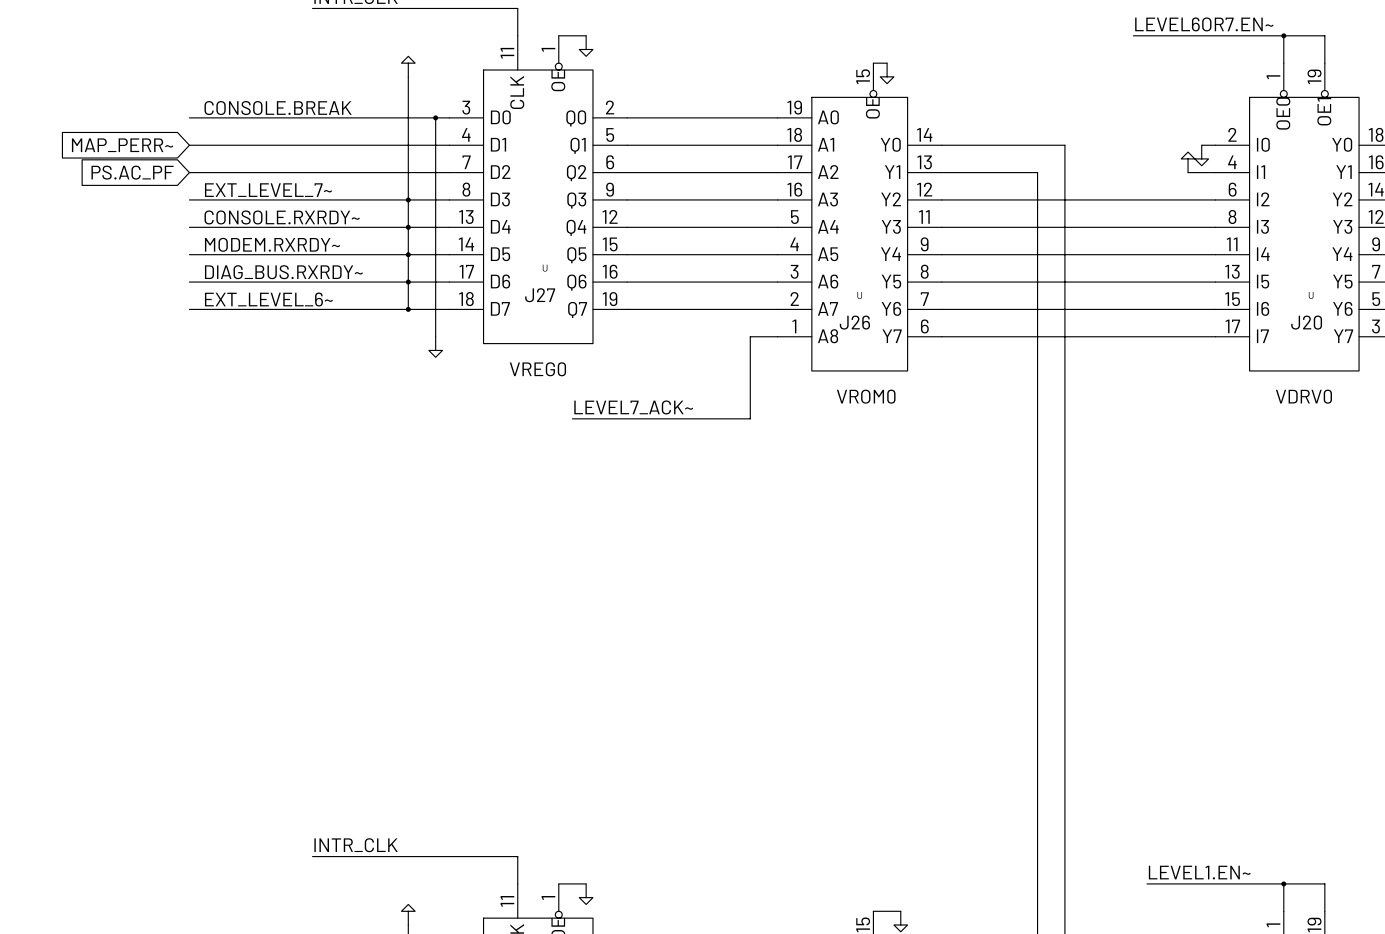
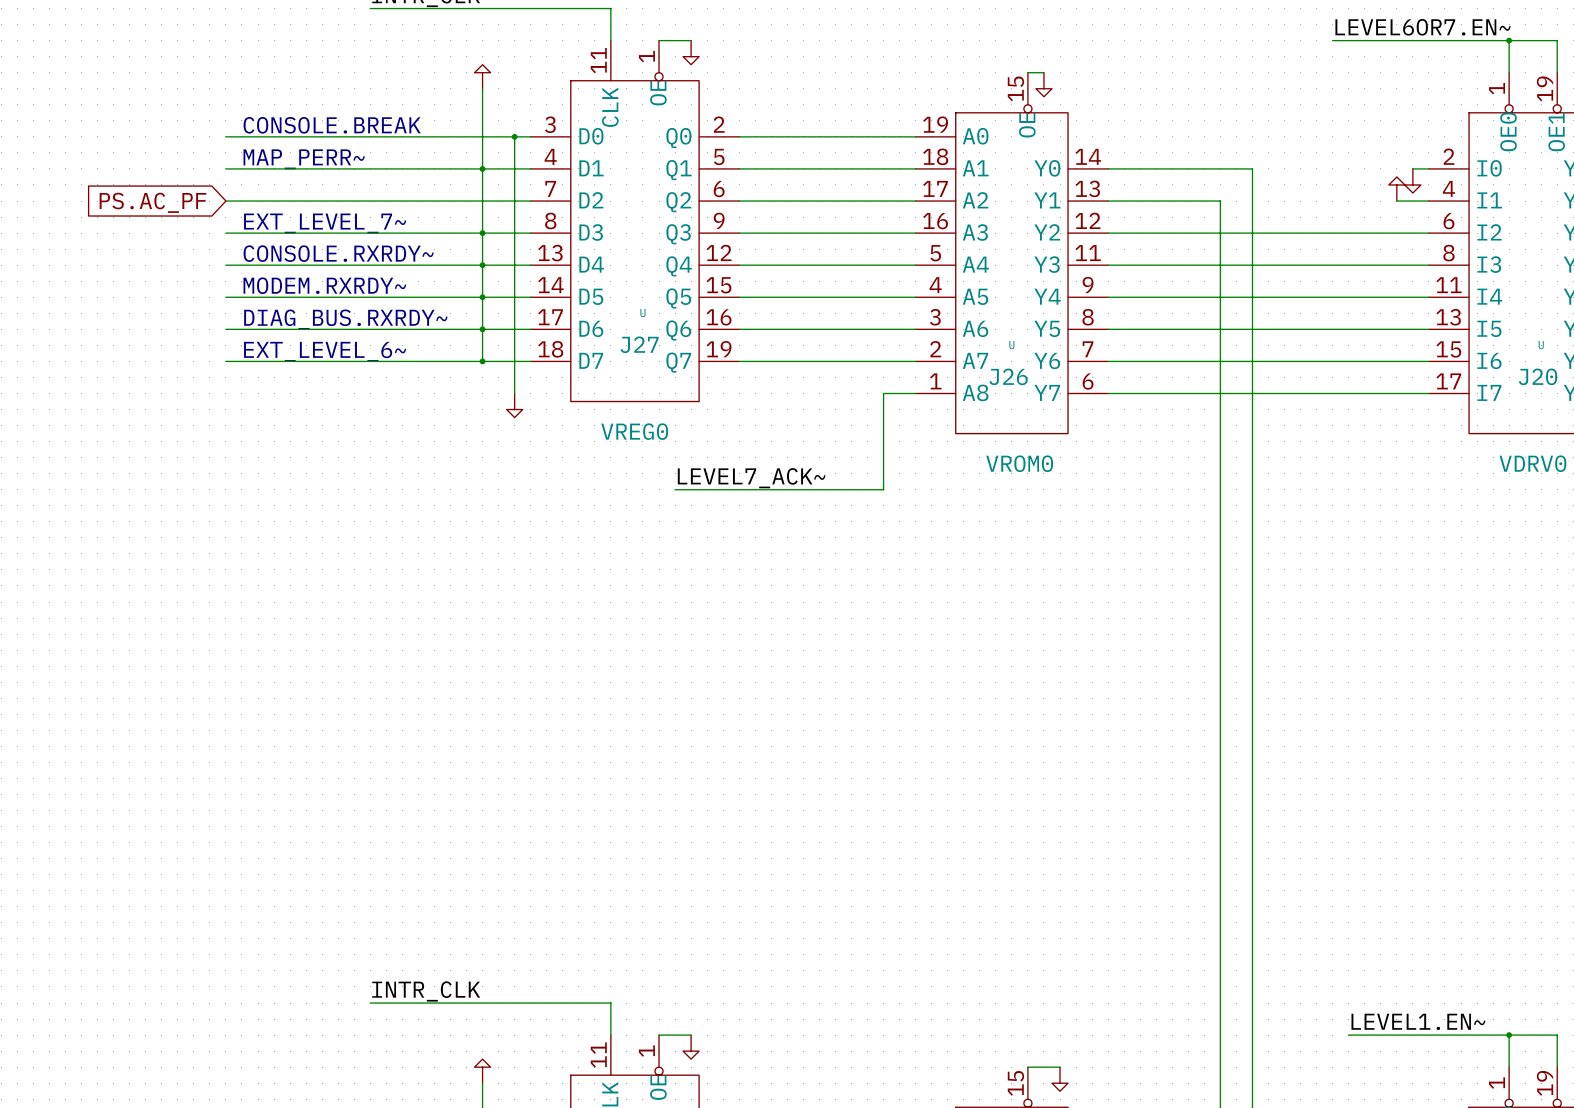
text: none -> MAP_PERR~ (304, 159)
global label: MAP_PERR~ (122, 145) -> none
junction: none -> (482, 168)

